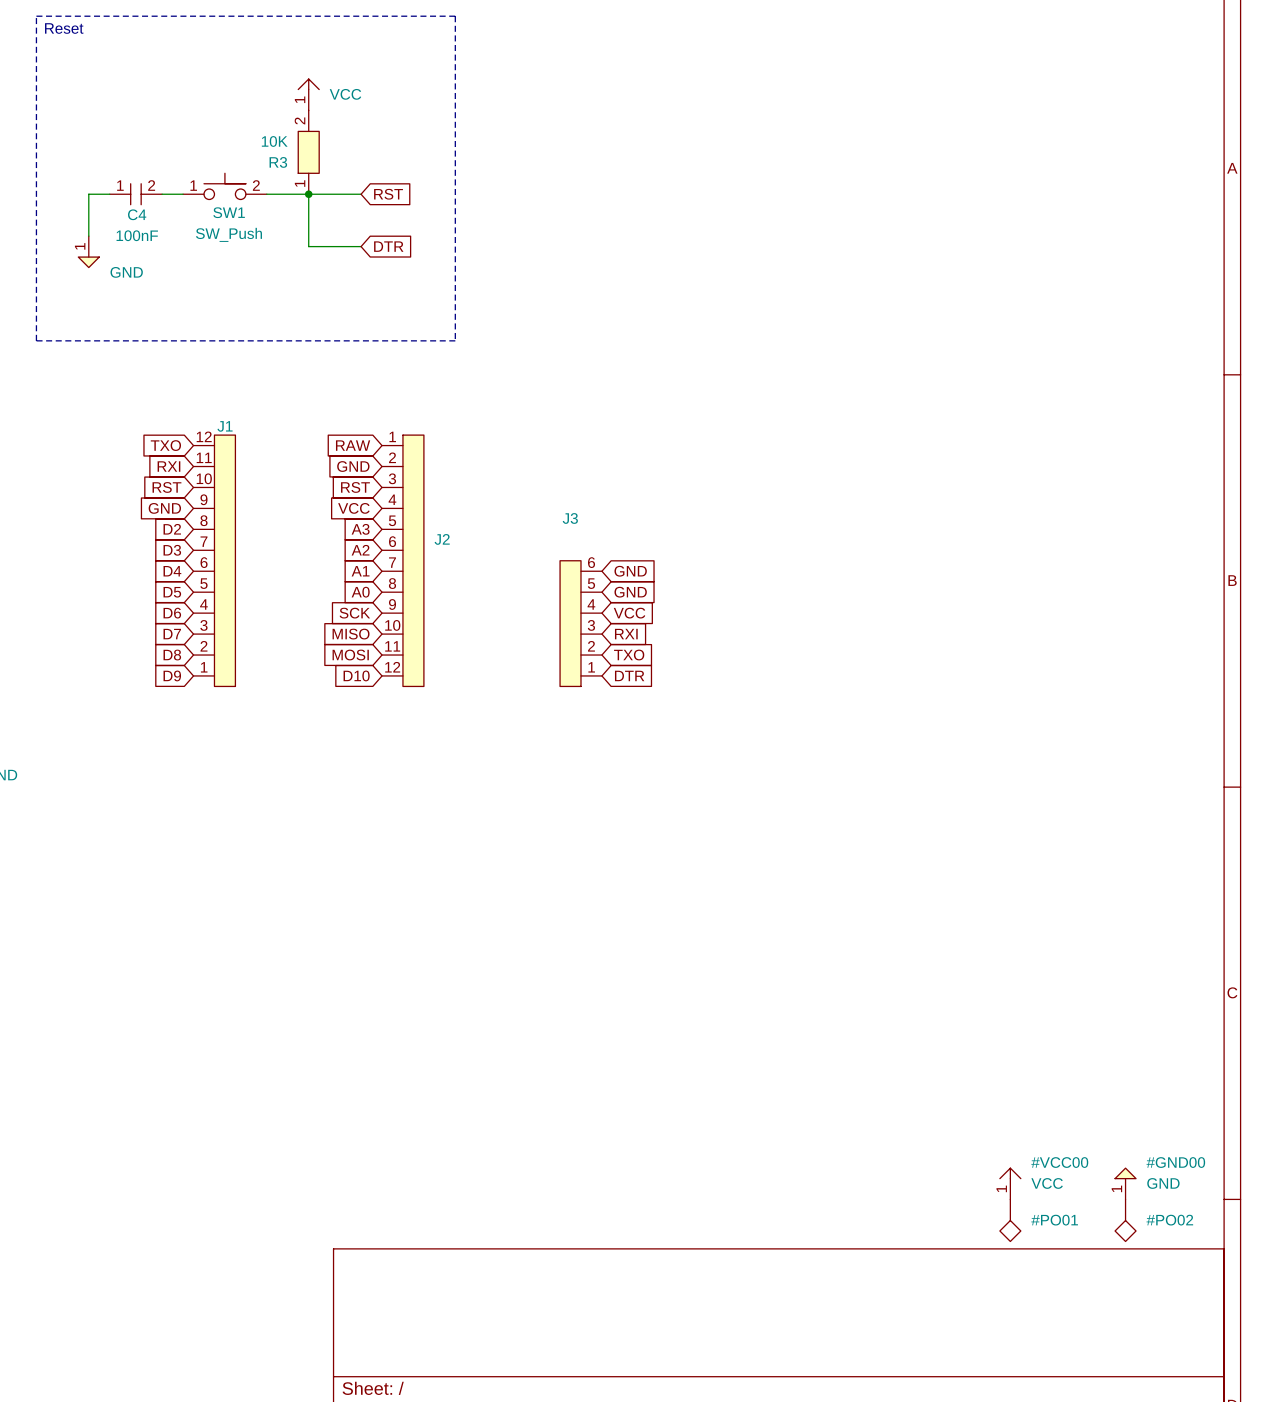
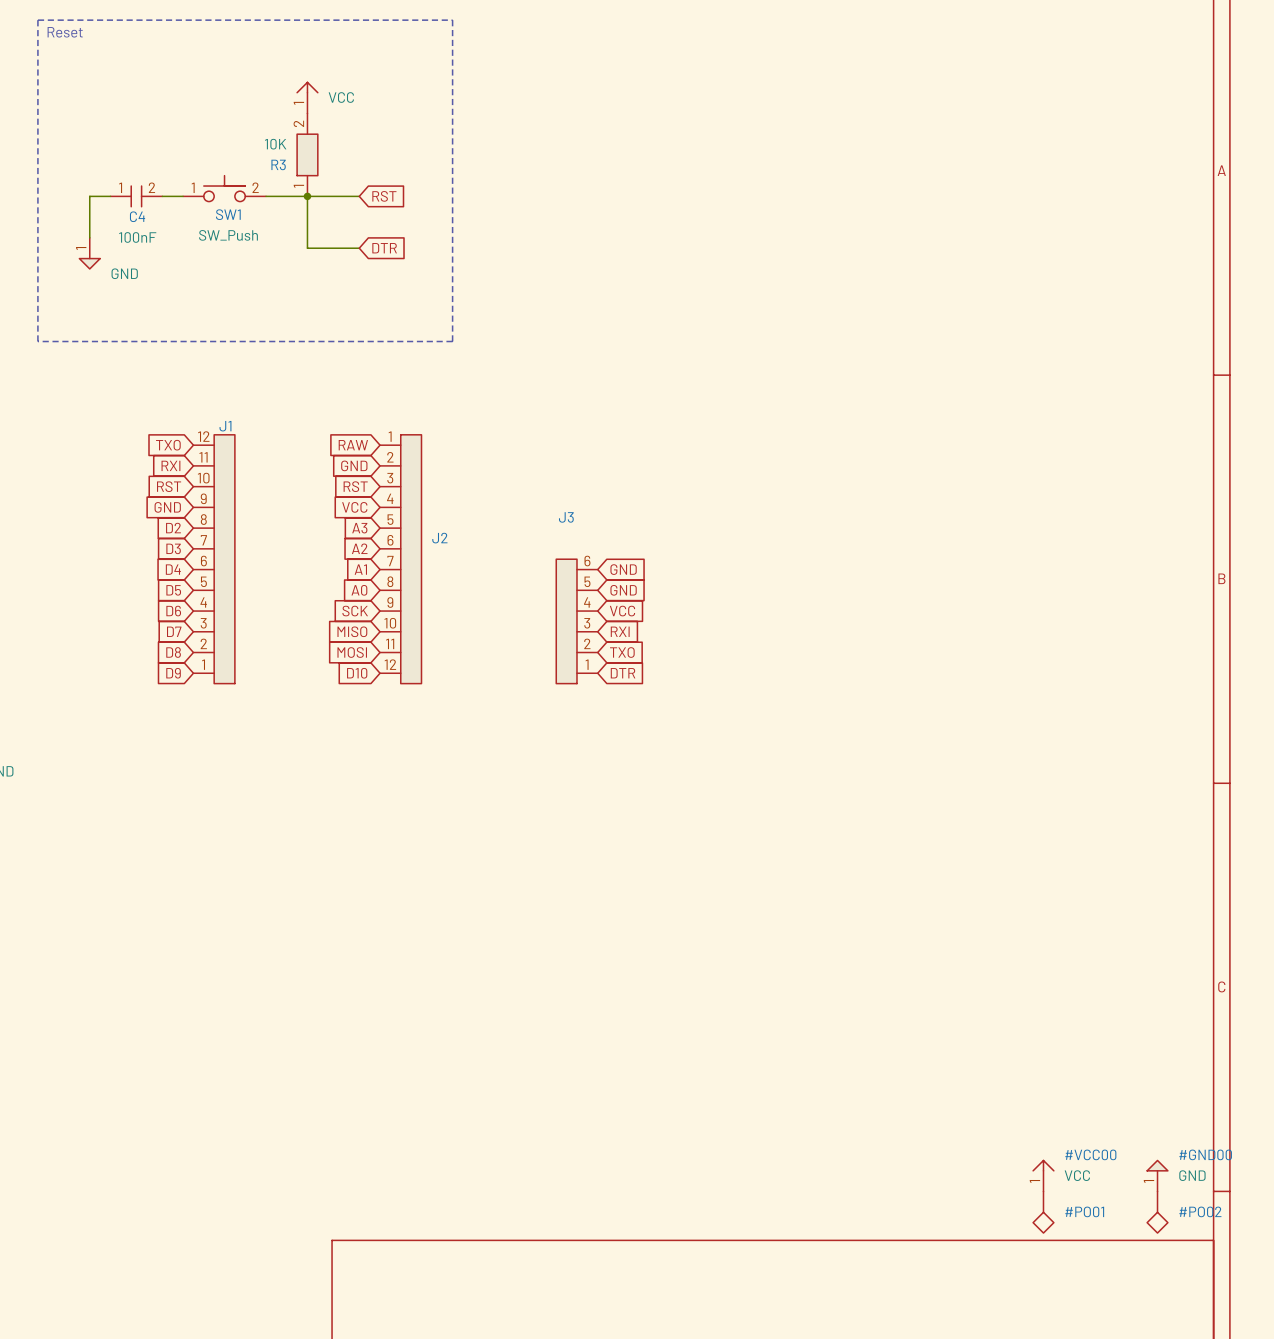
#VCC00 position: VCC (1010, 1183) -> VCC (1043, 1176)
#GND00 position: GND (1125, 1183) -> GND (1157, 1176)
#PO01 position: (1010, 1220) -> (1043, 1212)
#PO02 position: (1125, 1220) -> (1157, 1212)

